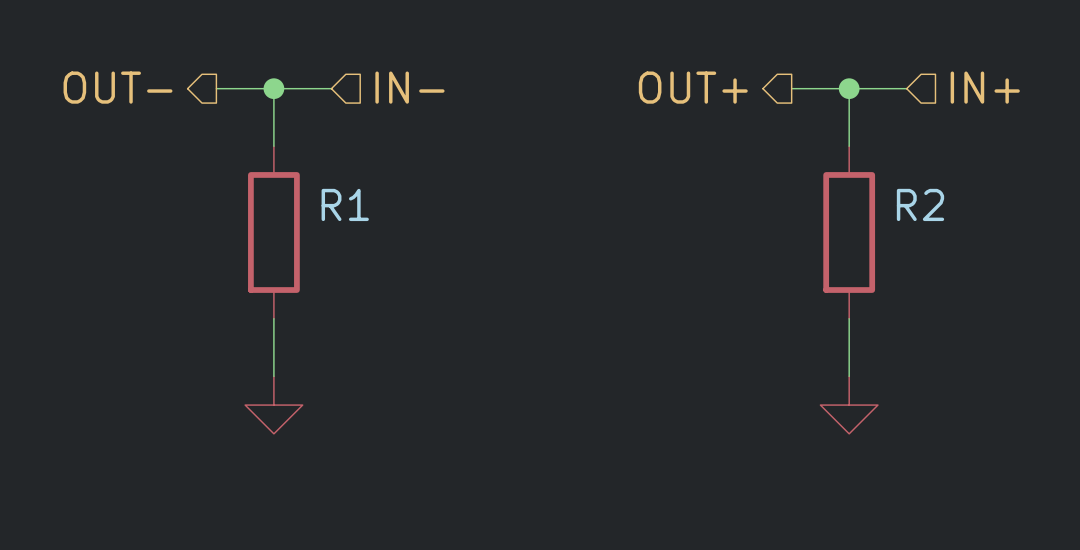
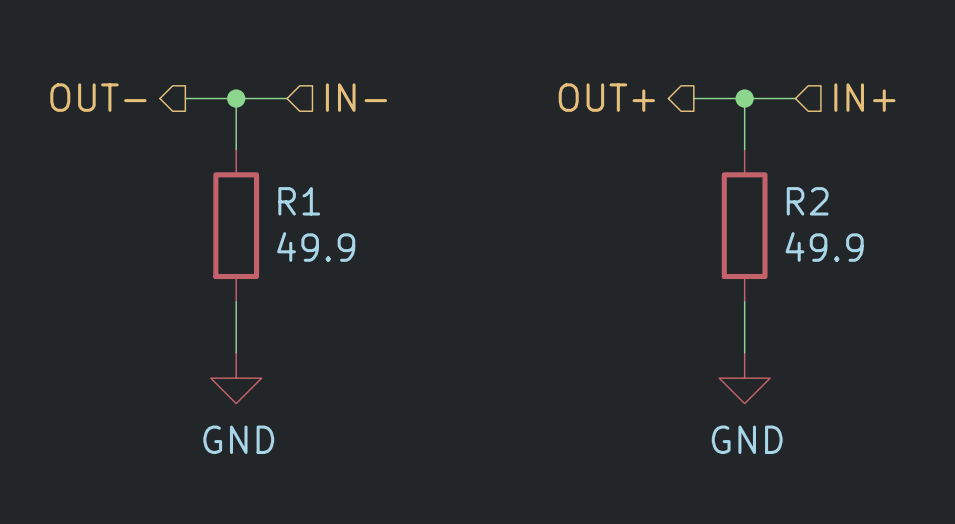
R1 value: none -> 49.9 (316, 246)
R2 value: none -> 49.9 (824, 246)
power symbol text: none -> GND (238, 439)
power symbol text: none -> GND (747, 439)

